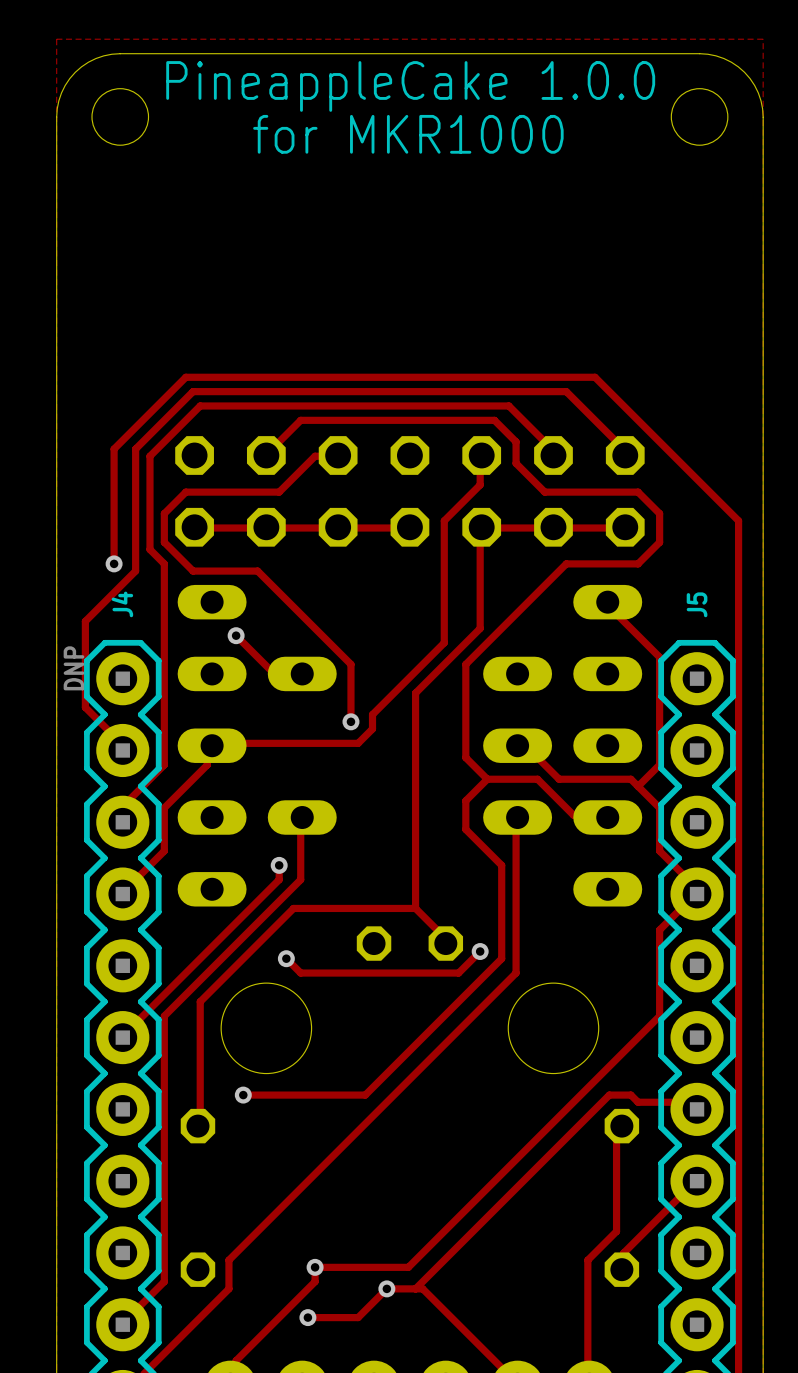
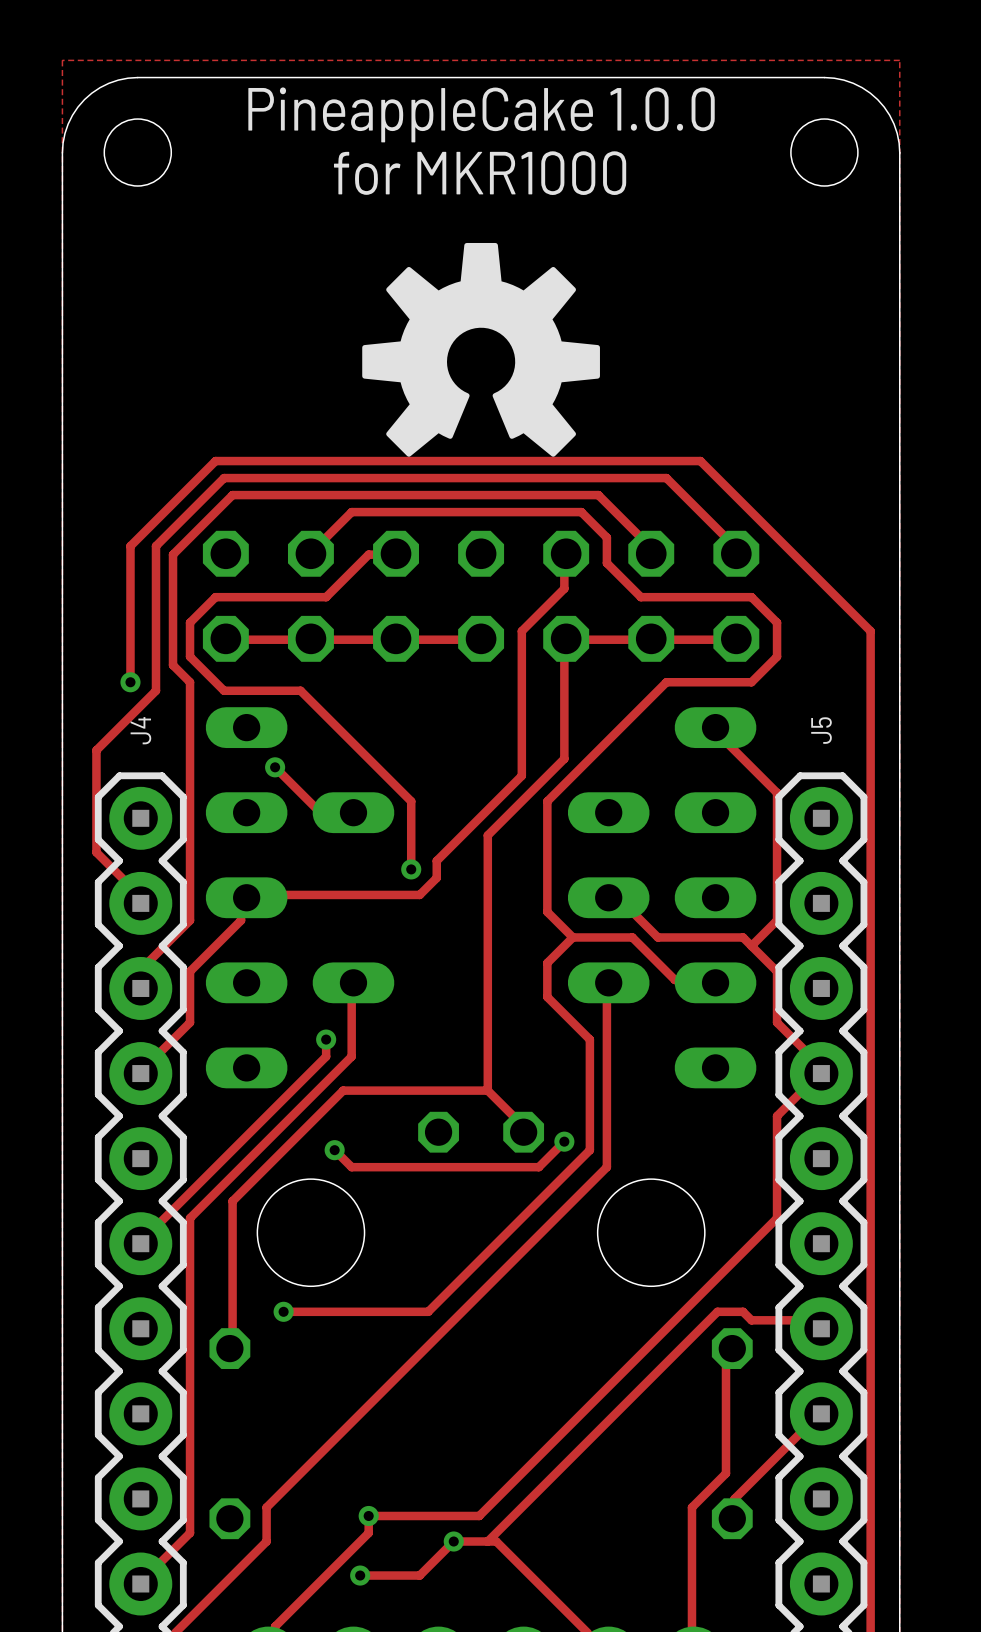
drawing: none -> [362, 242, 600, 457]
J4 value: DNP (73, 668) -> none

